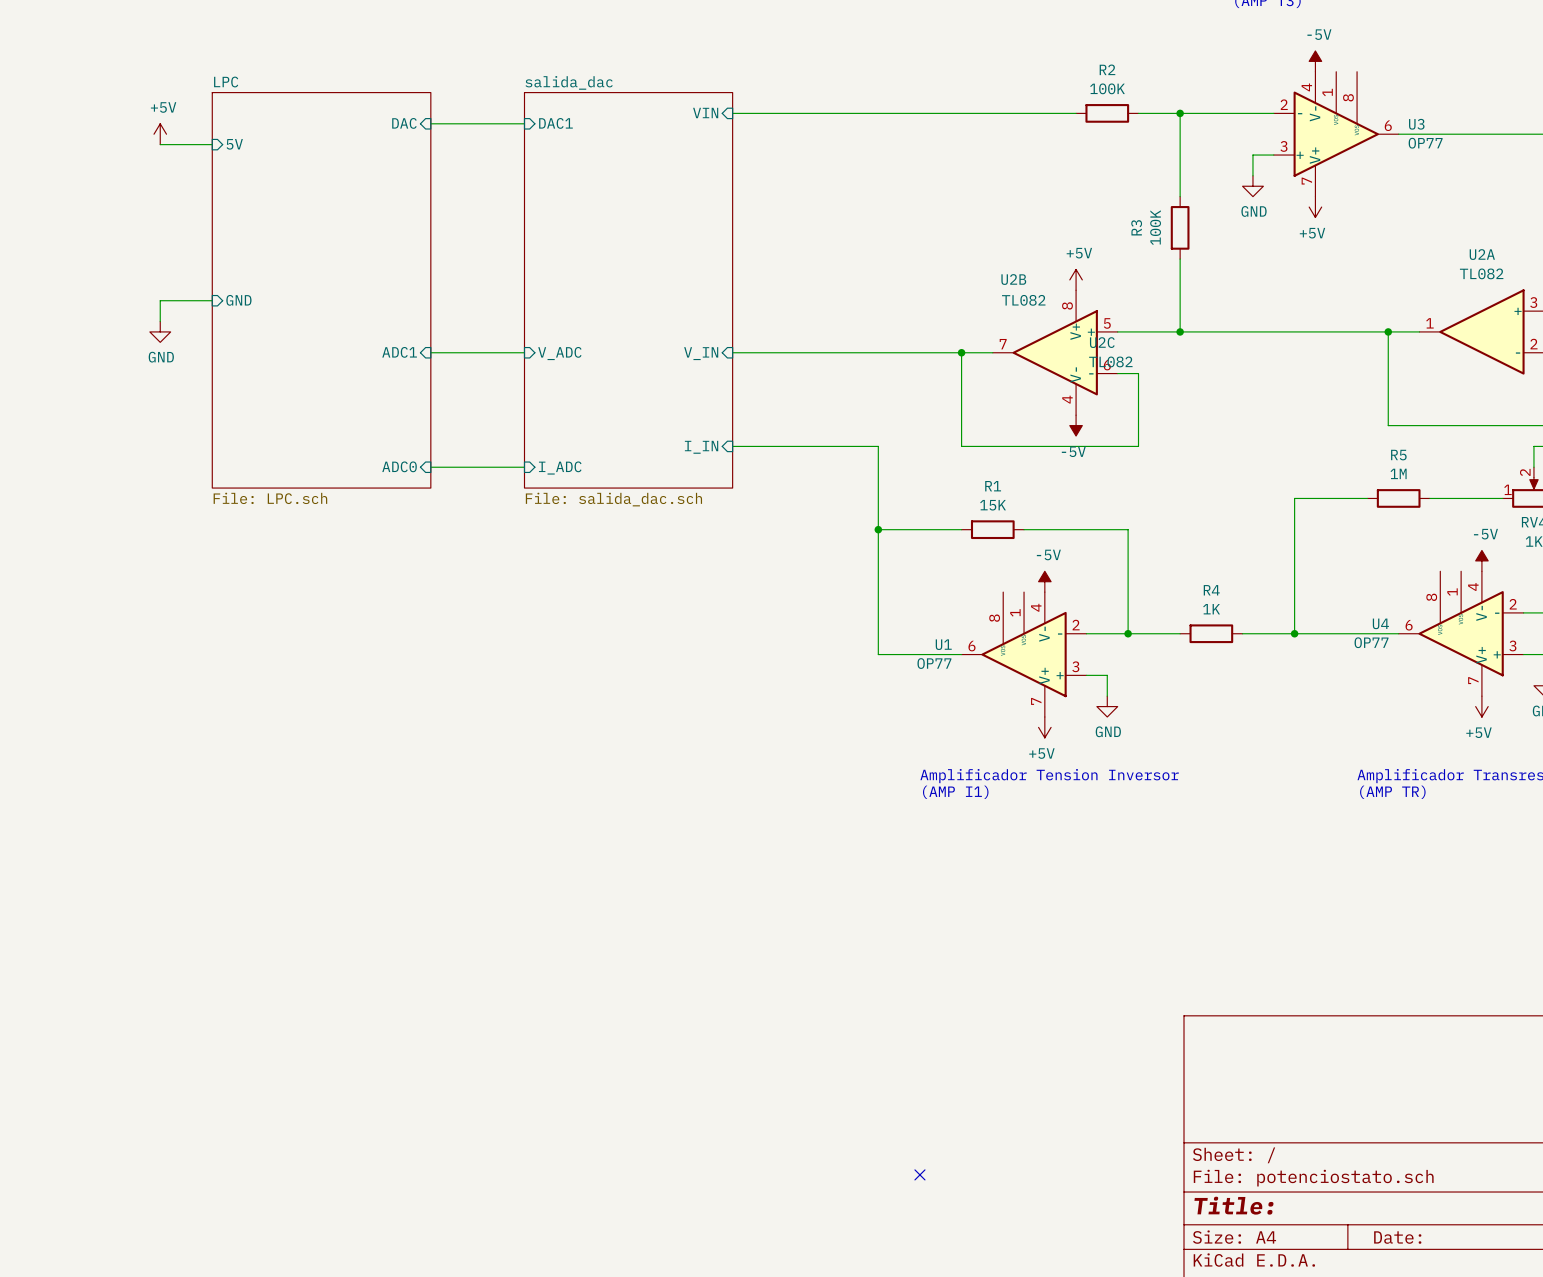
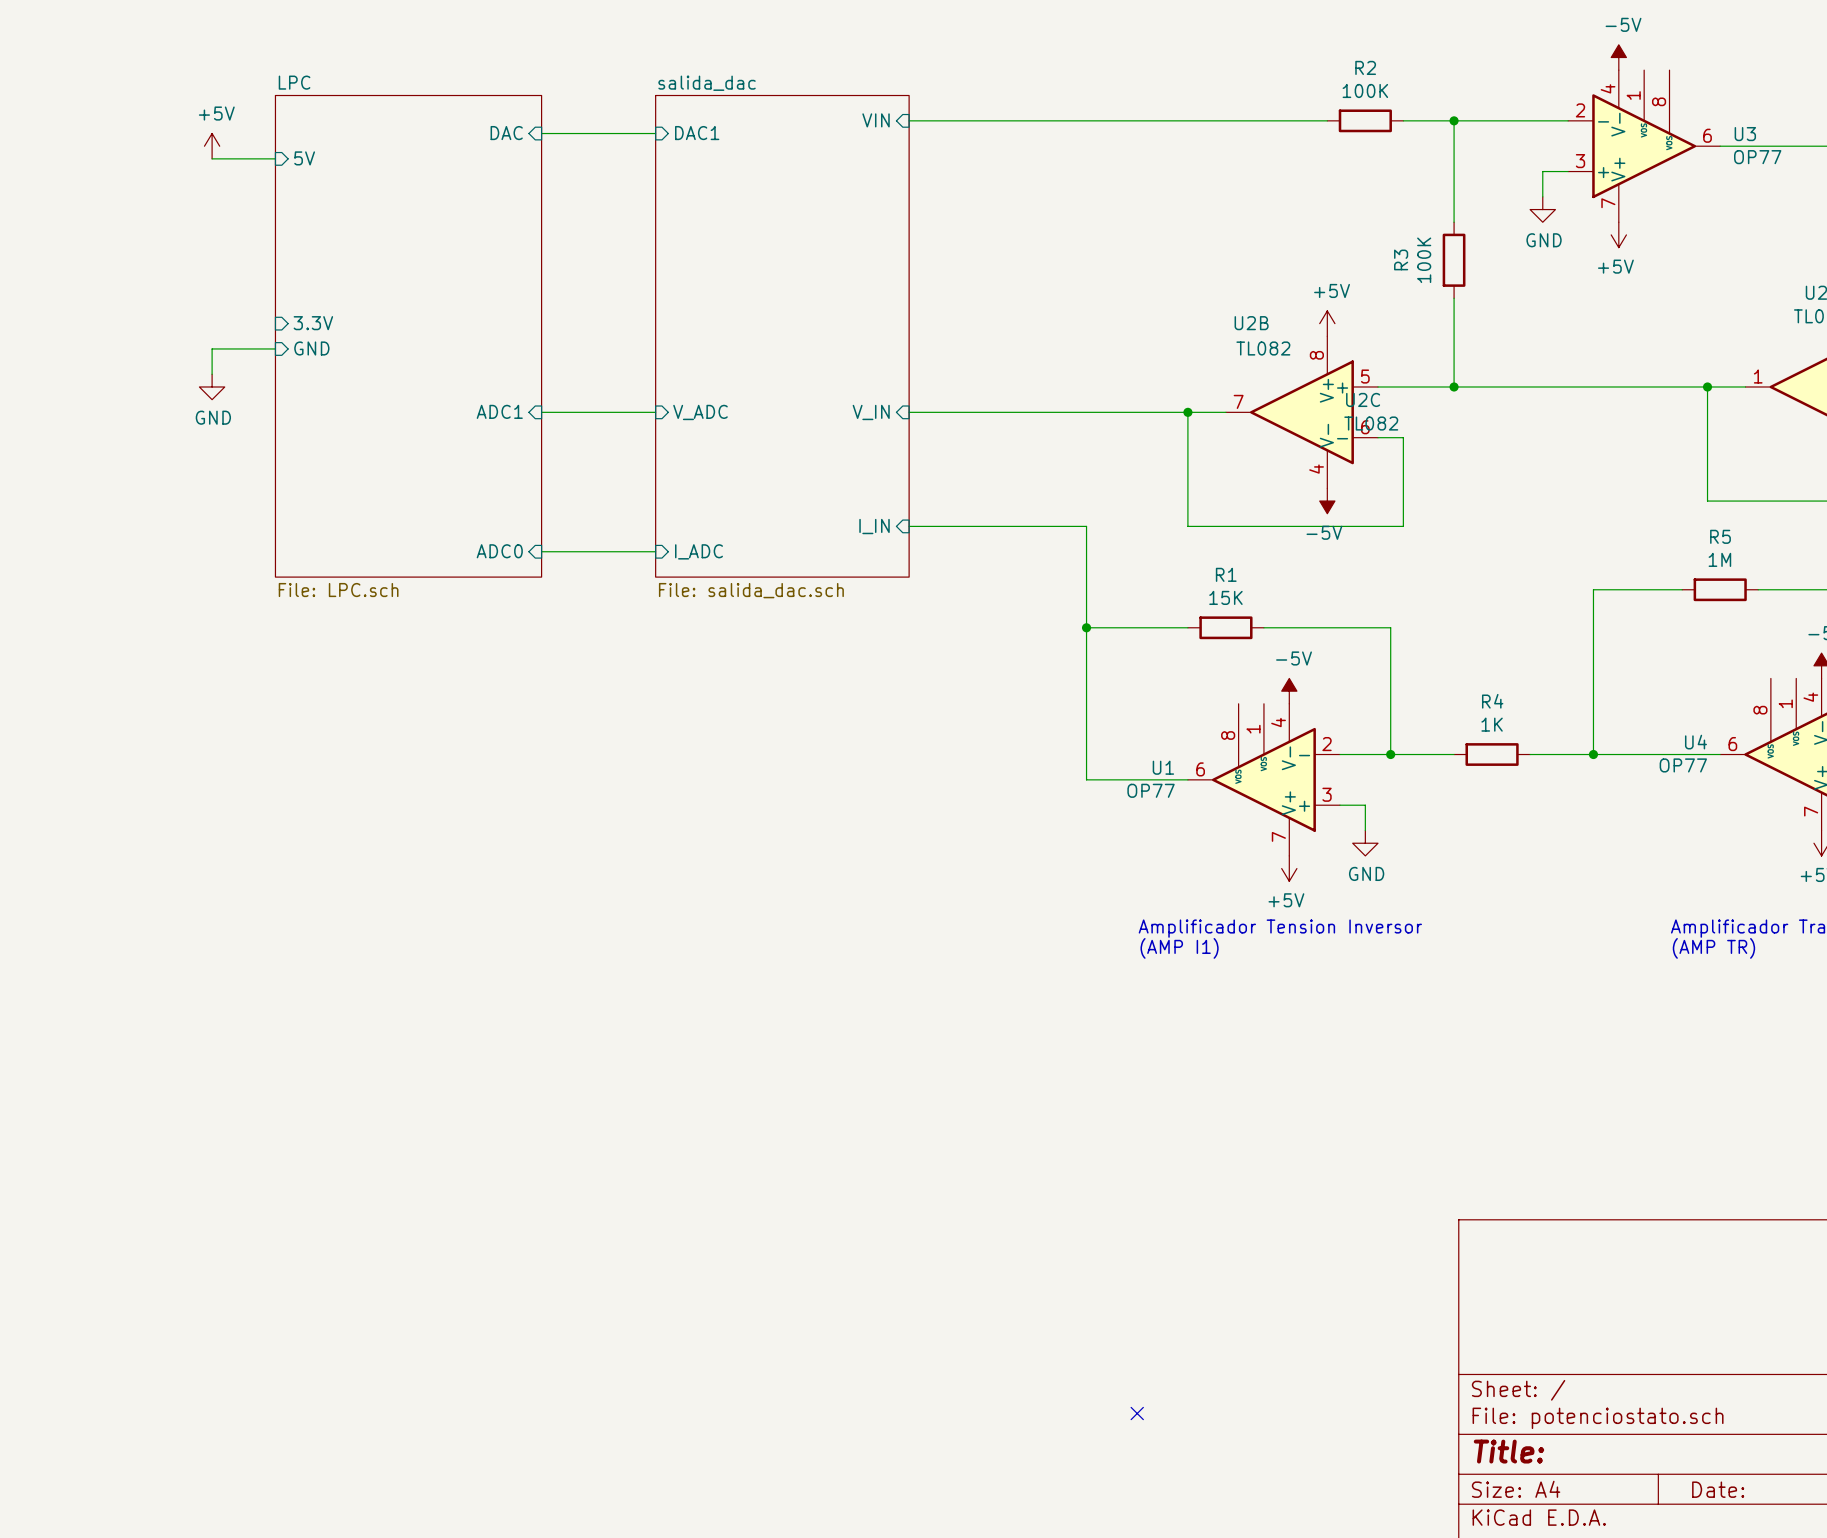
sheet pin: none -> 3.3V (313, 323)

